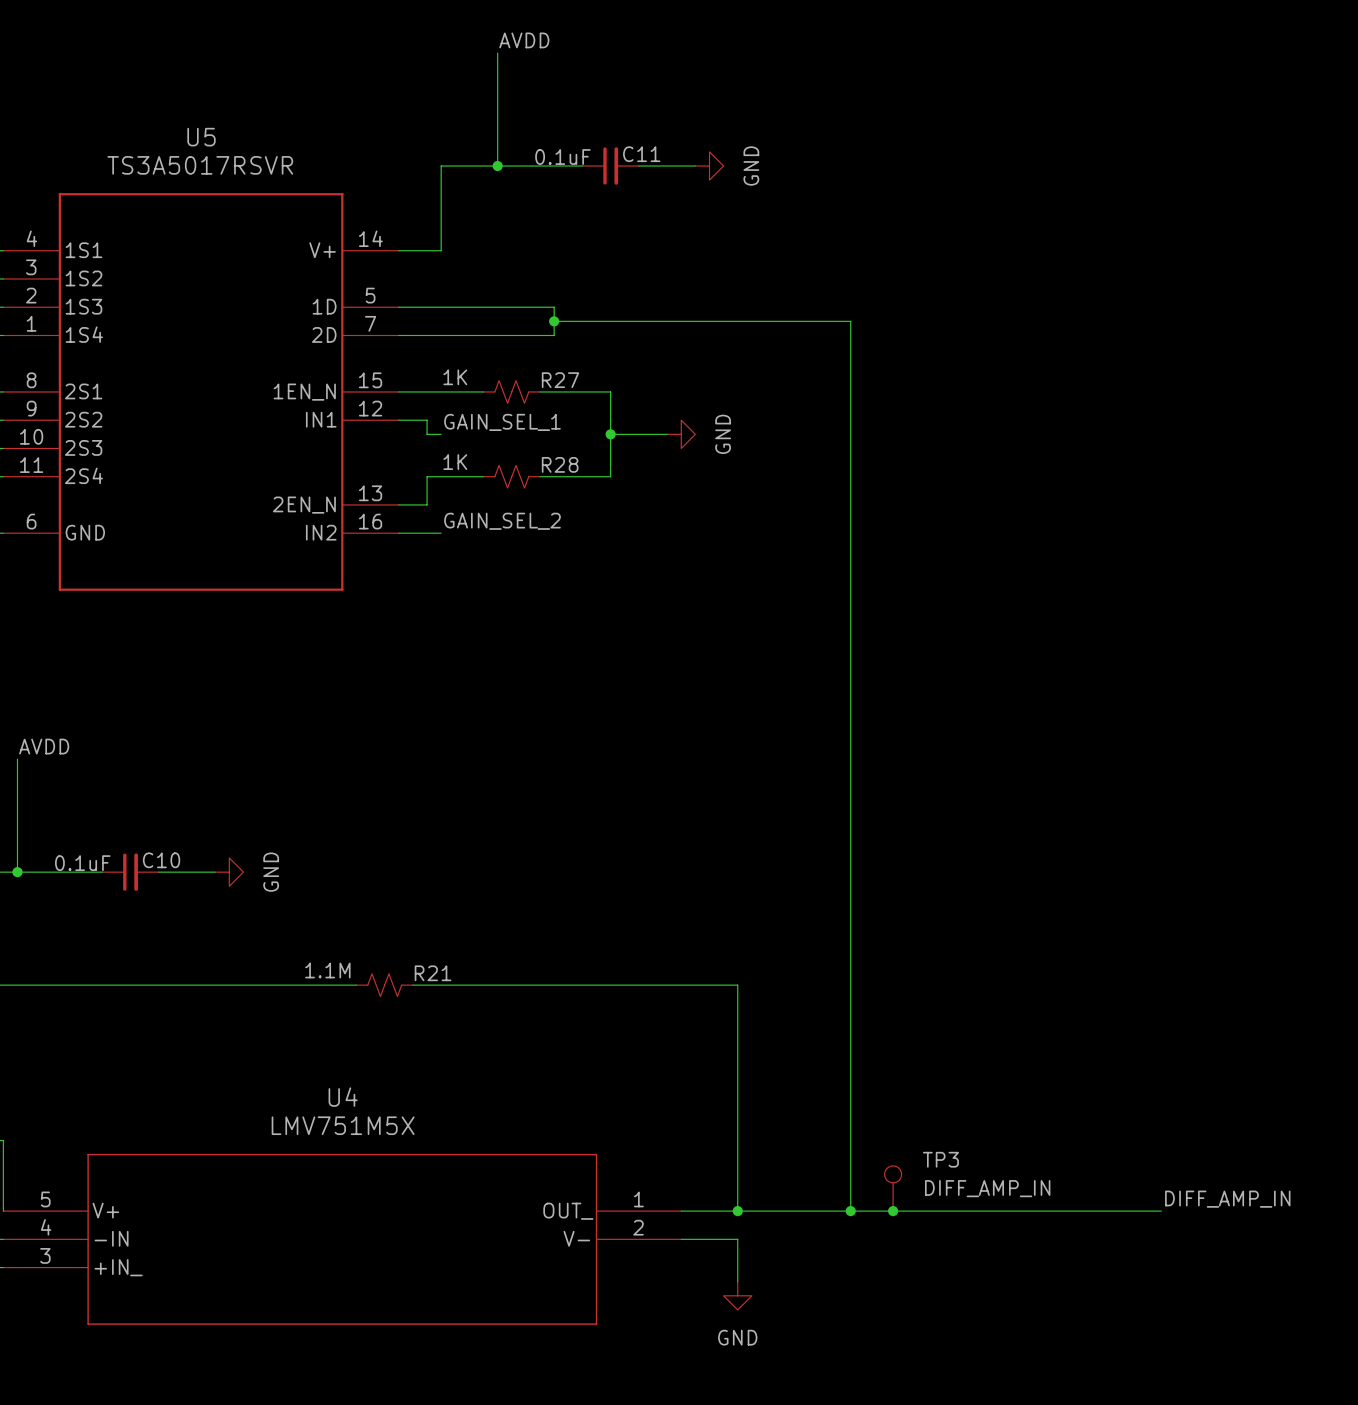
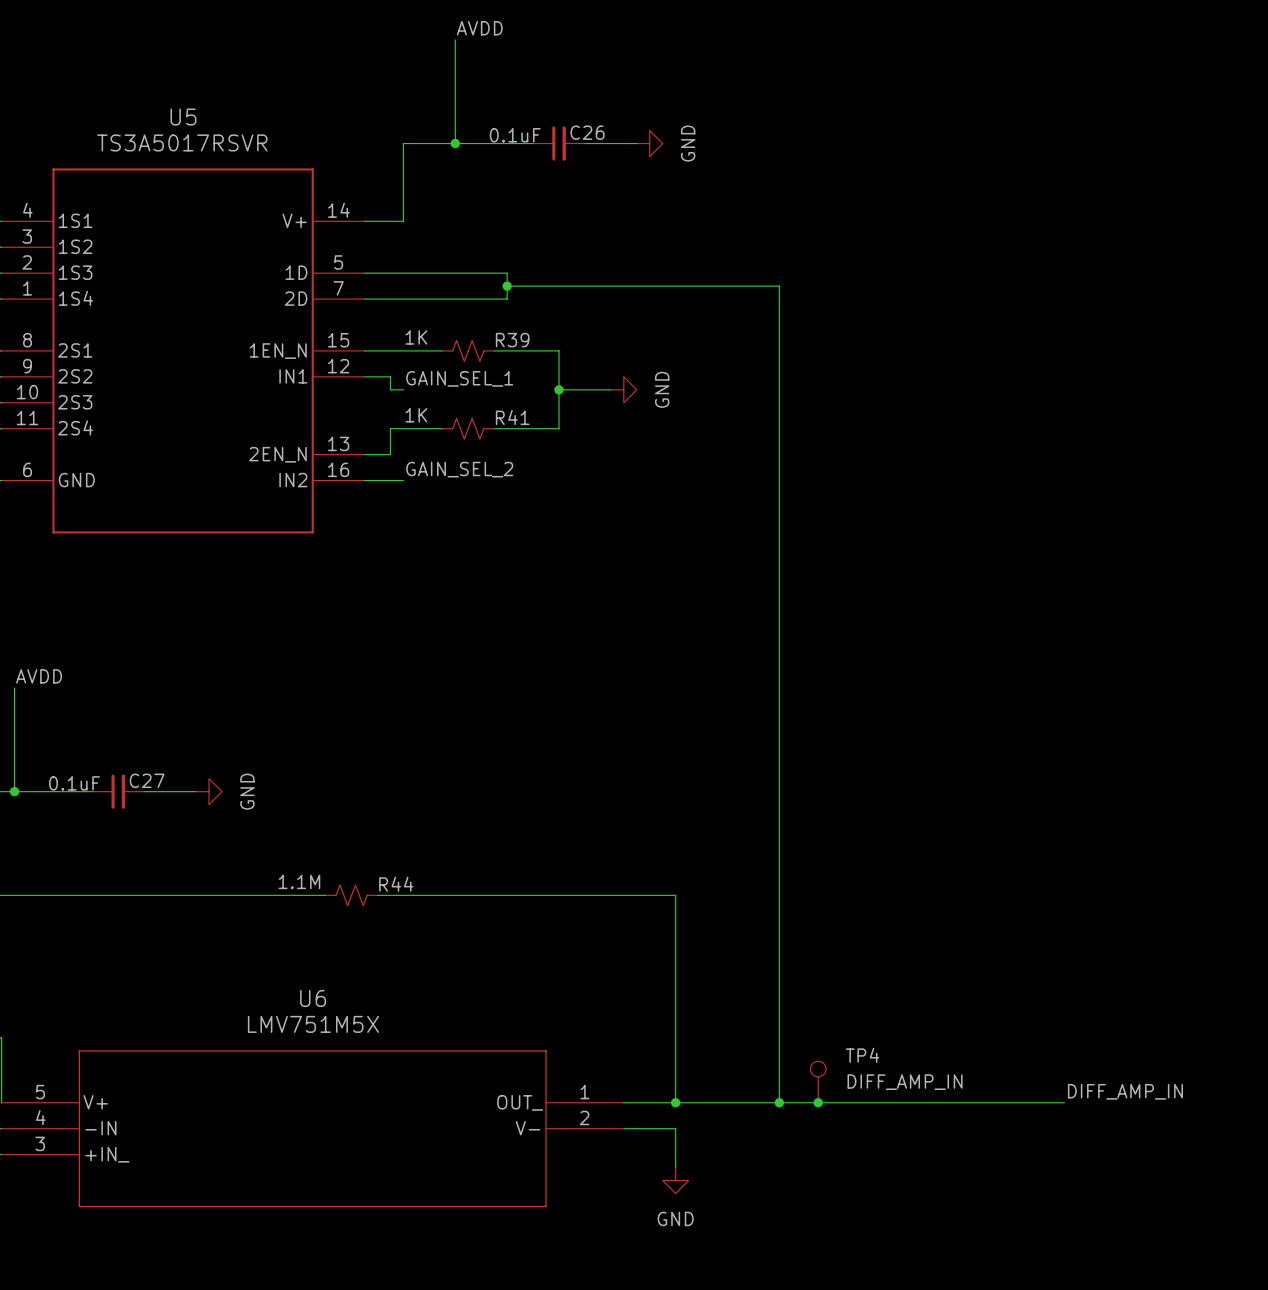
C11 name: C11 (641, 154) -> C26 (587, 132)
R27 name: R27 (560, 380) -> R39 (512, 340)
R28 name: R28 (560, 464) -> R41 (512, 417)
C10 name: C10 (161, 860) -> C27 (147, 780)
R21 name: R21 (433, 973) -> R44 (396, 884)
U4 name: U4 (343, 1097) -> U6 (313, 998)
TP3 name: TP3 (940, 1159) -> TP4 (862, 1055)

